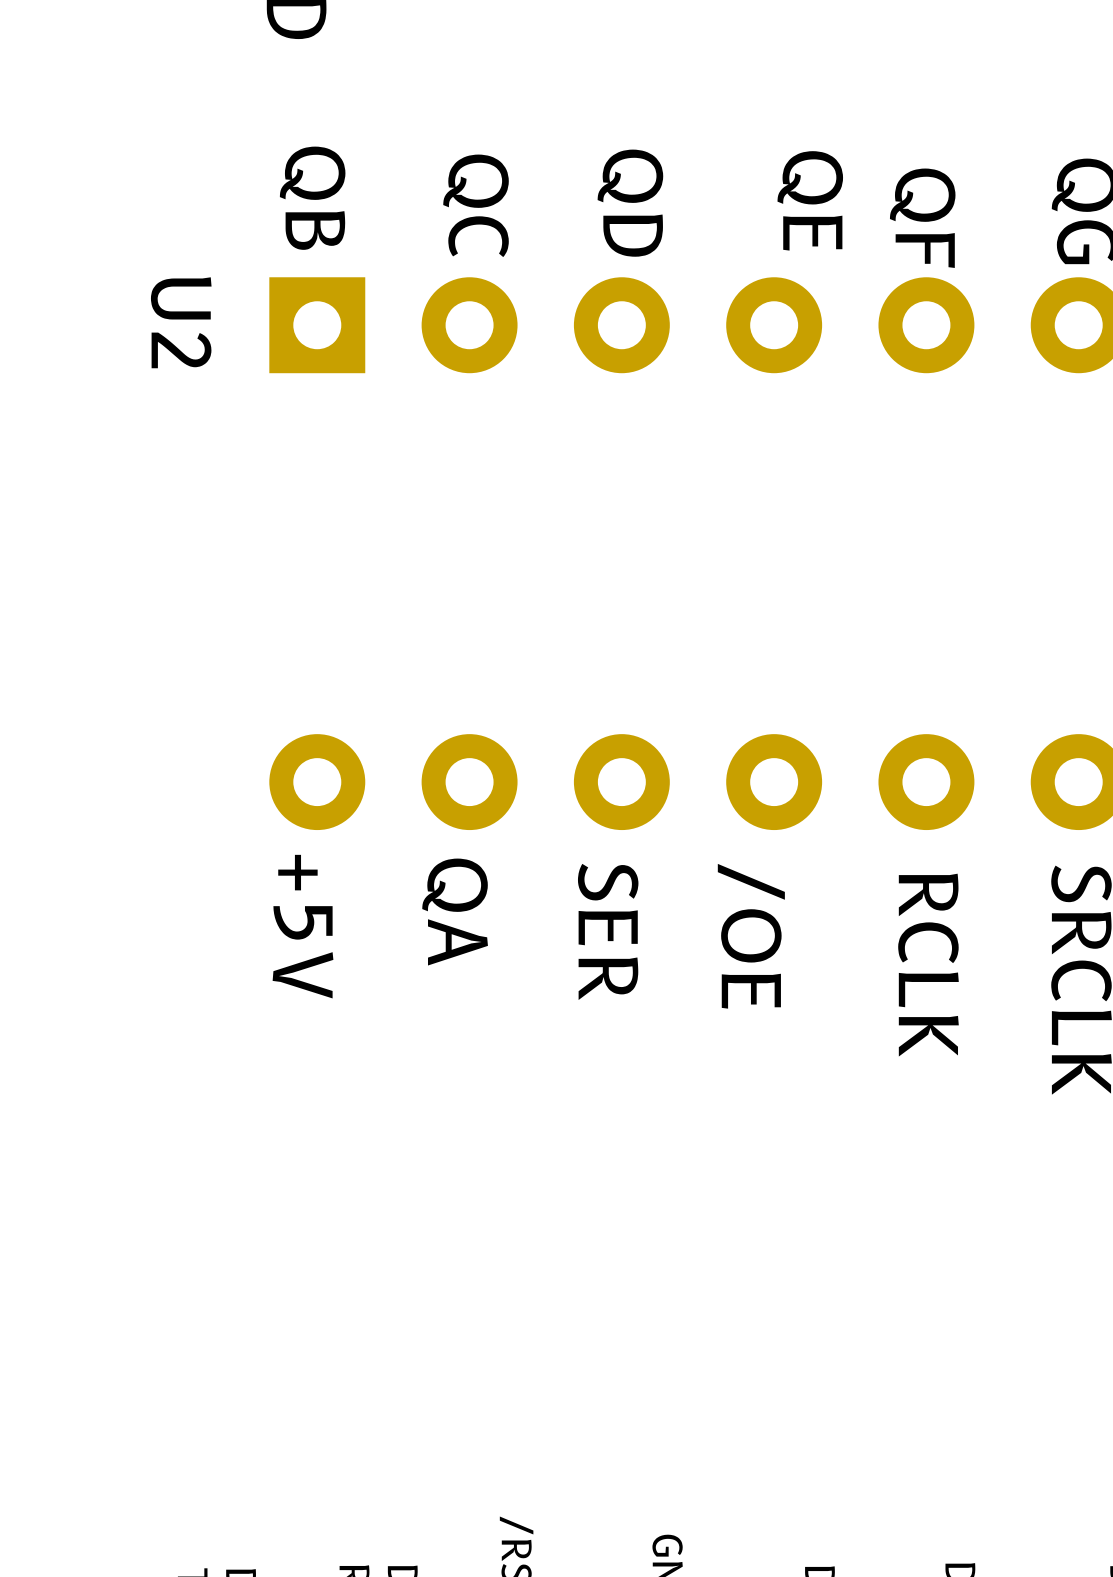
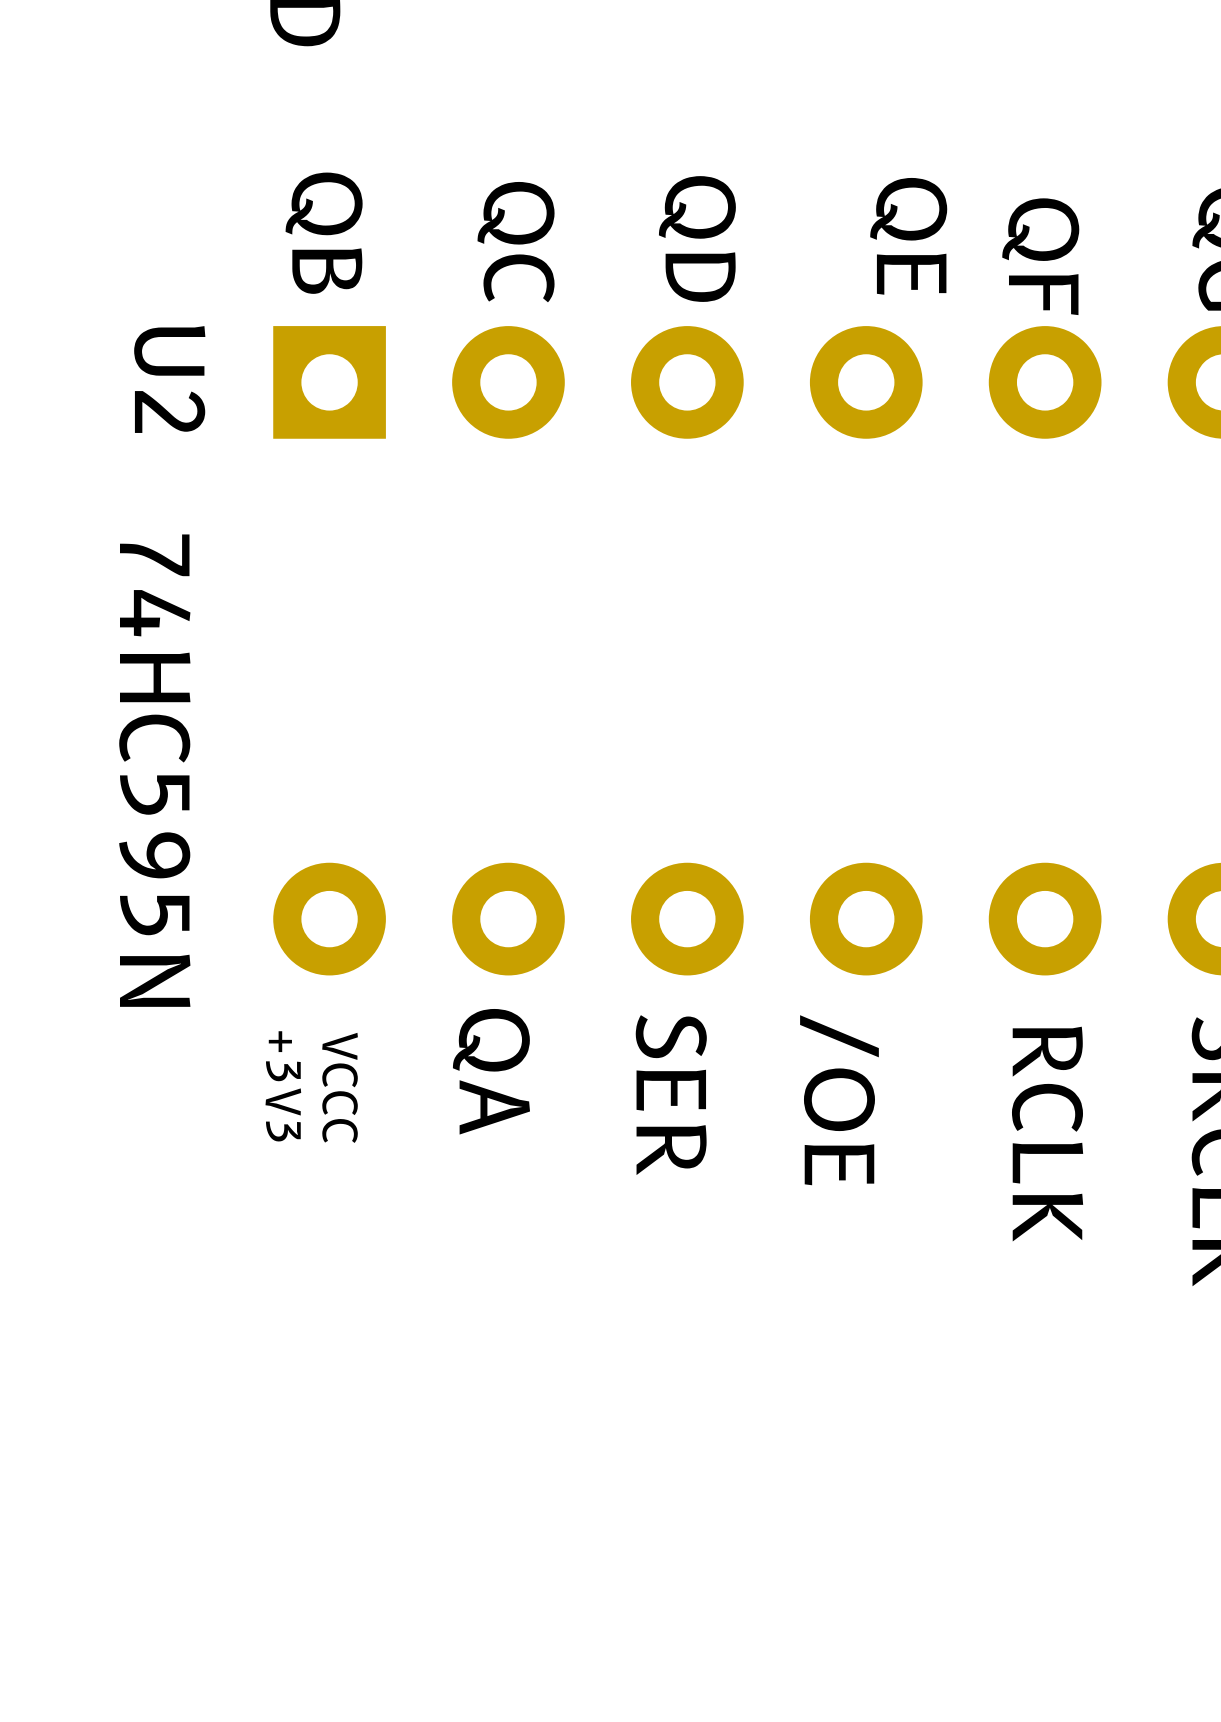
text: none -> 74HC595N (154, 770)
text: none -> +3V3 (283, 1086)
text: none -> VCCC (340, 1087)
text: +5V (303, 926) -> none

